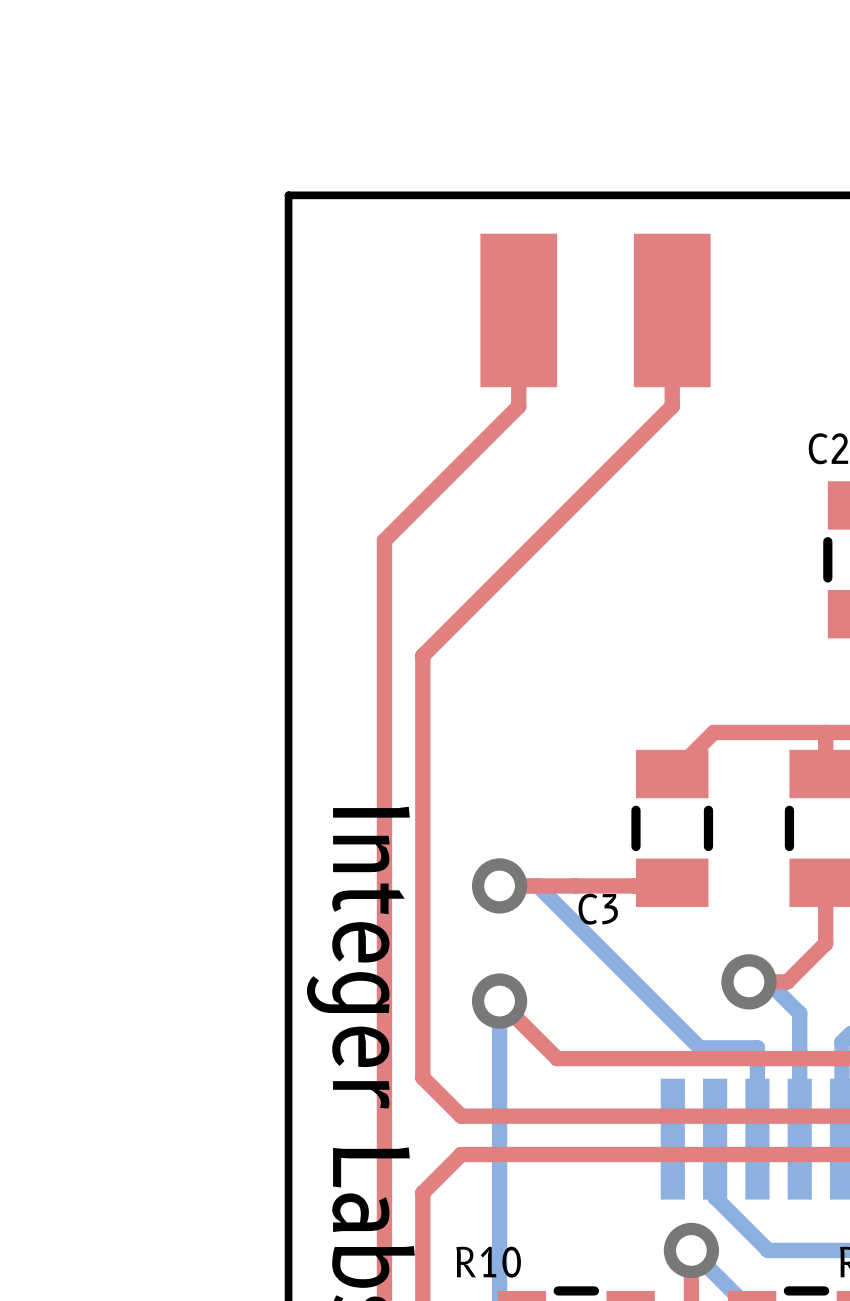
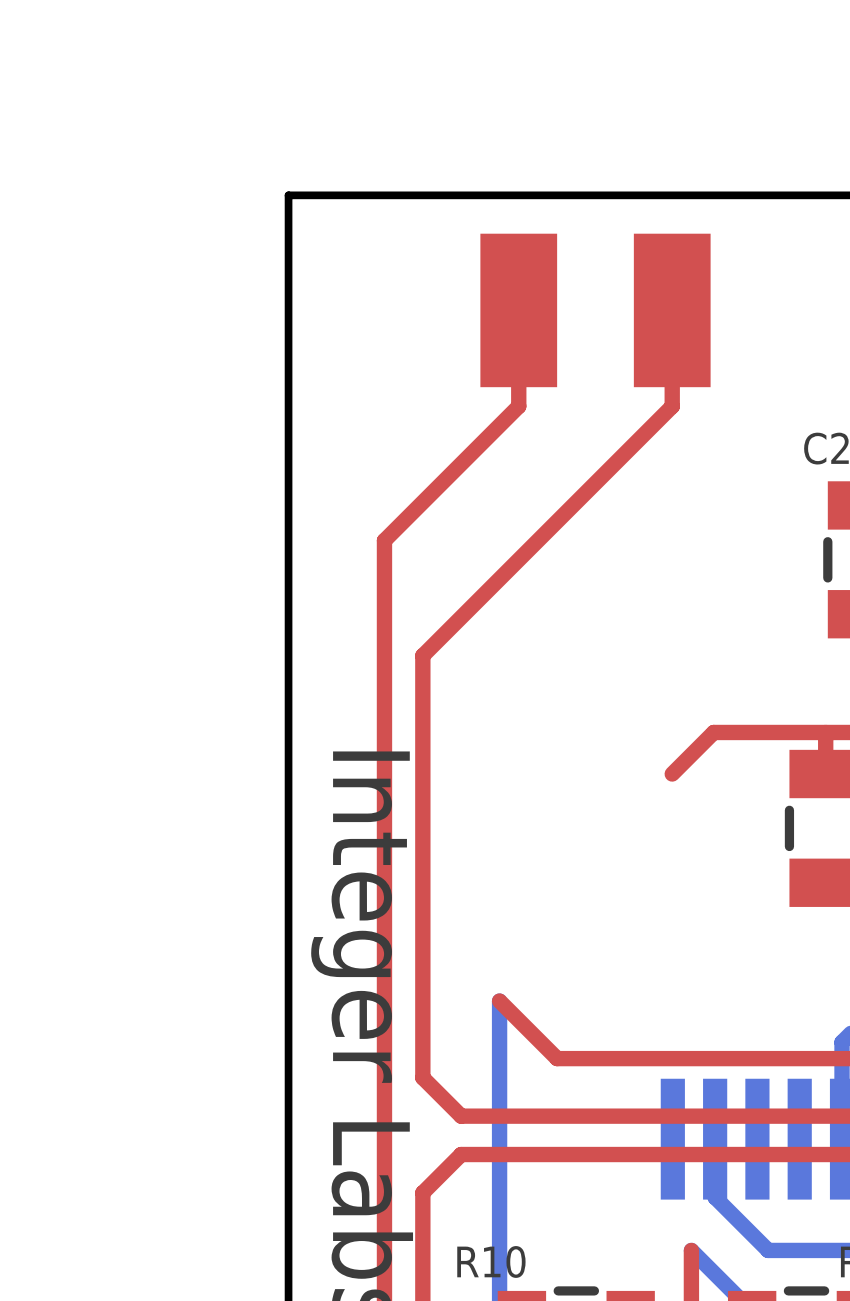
C3: (672, 828) -> none
top track: (672, 882) (634, 885) (499, 885) -> none
top track: (825, 882) (825, 943) (787, 981) (748, 981) -> none
bottom track: (499, 885) (537, 885) (699, 1047) (757, 1047) (757, 1139) -> none
via: (499, 885) -> none
bottom track: (748, 981) (768, 981) (799, 1013) (799, 1139) -> none
via: (748, 981) -> none
via: (499, 1001) -> none
via: (691, 1250) -> none

